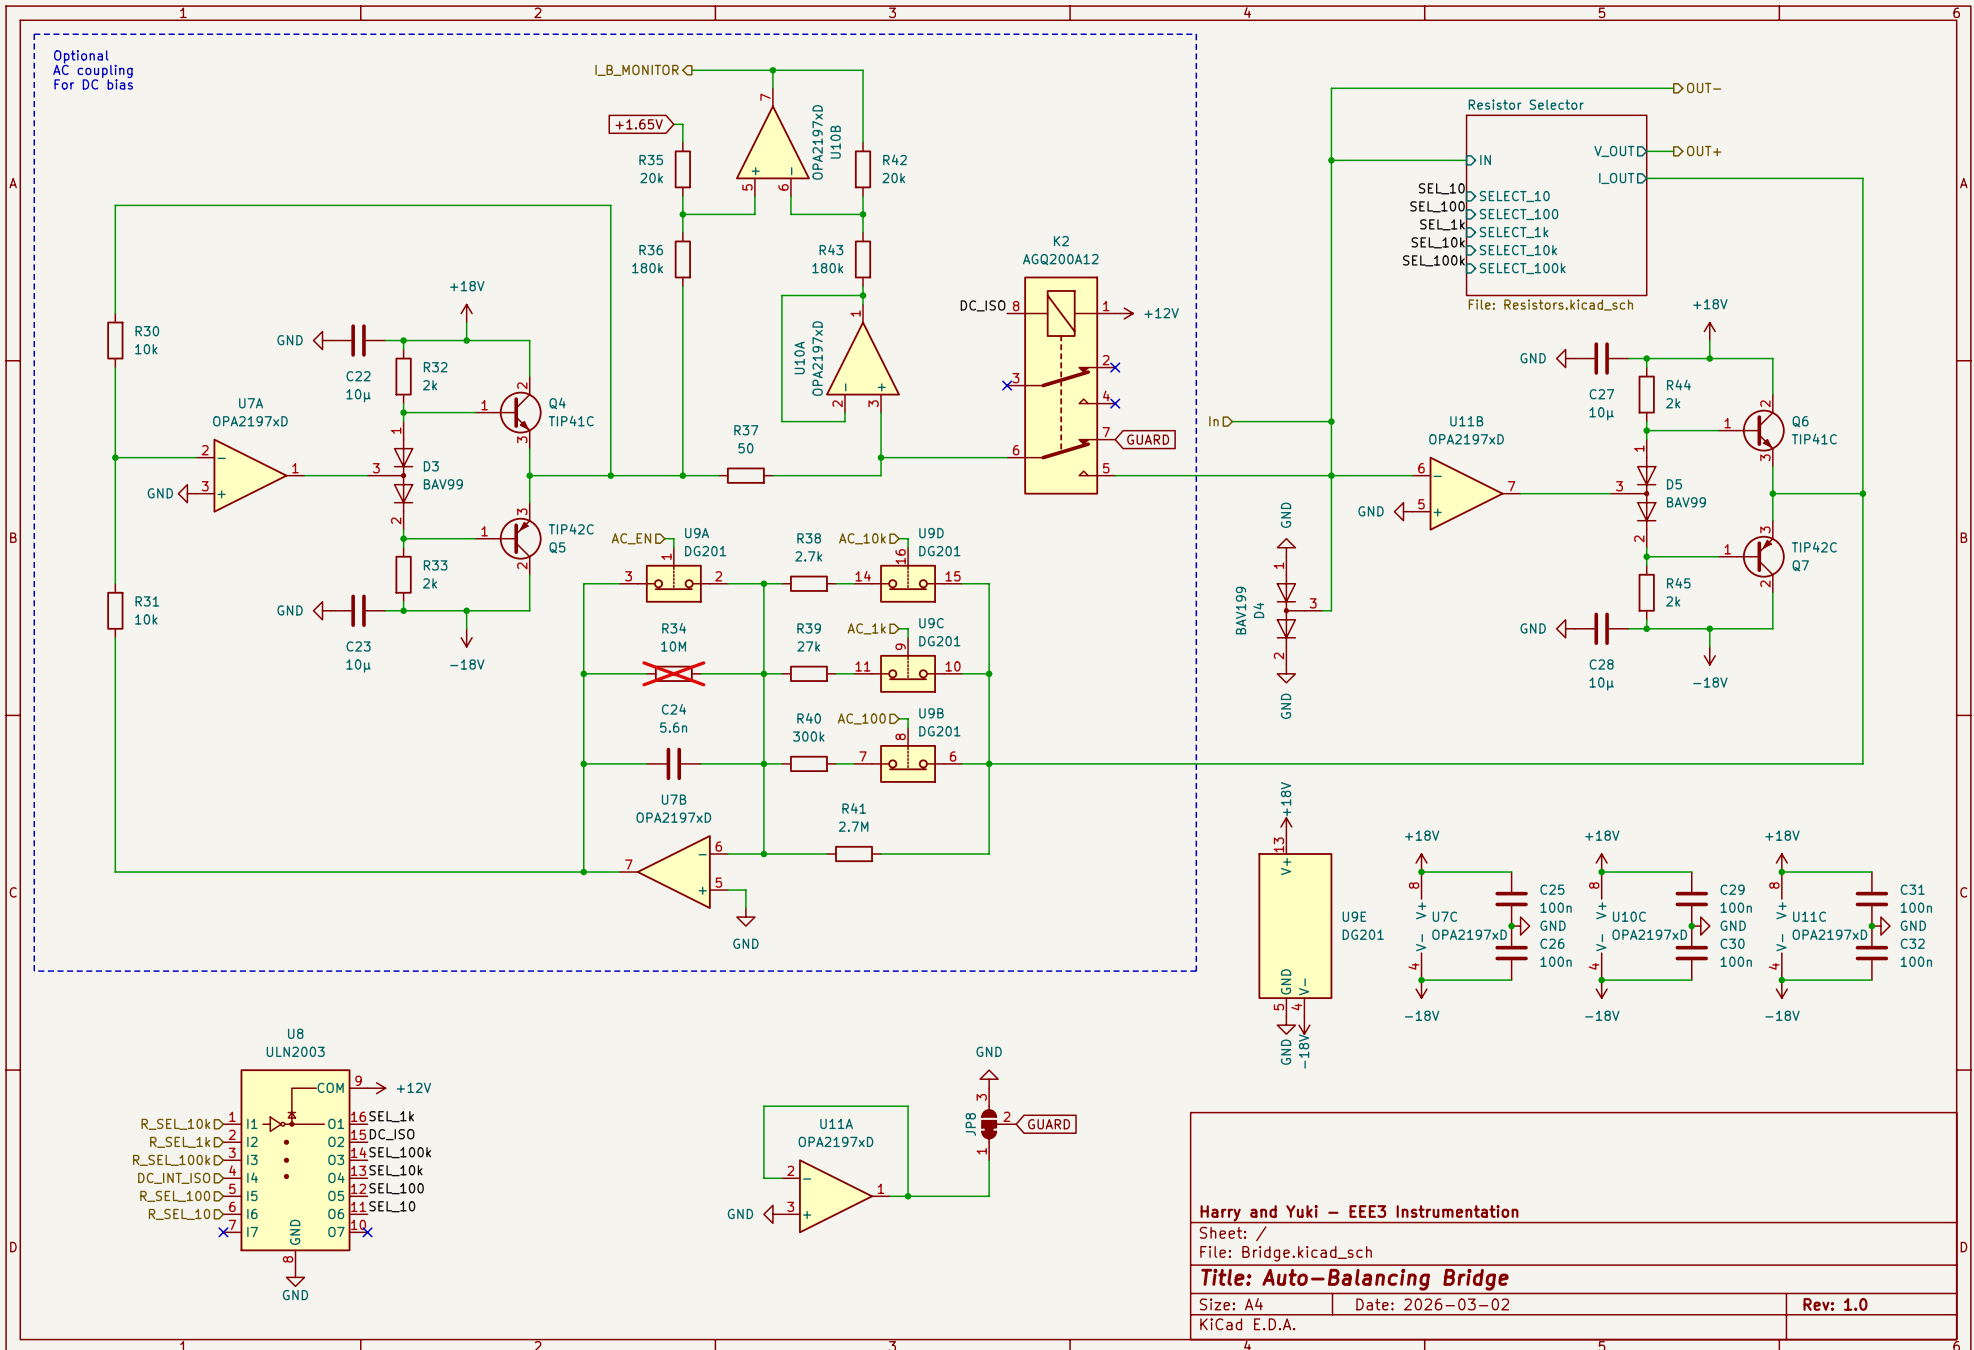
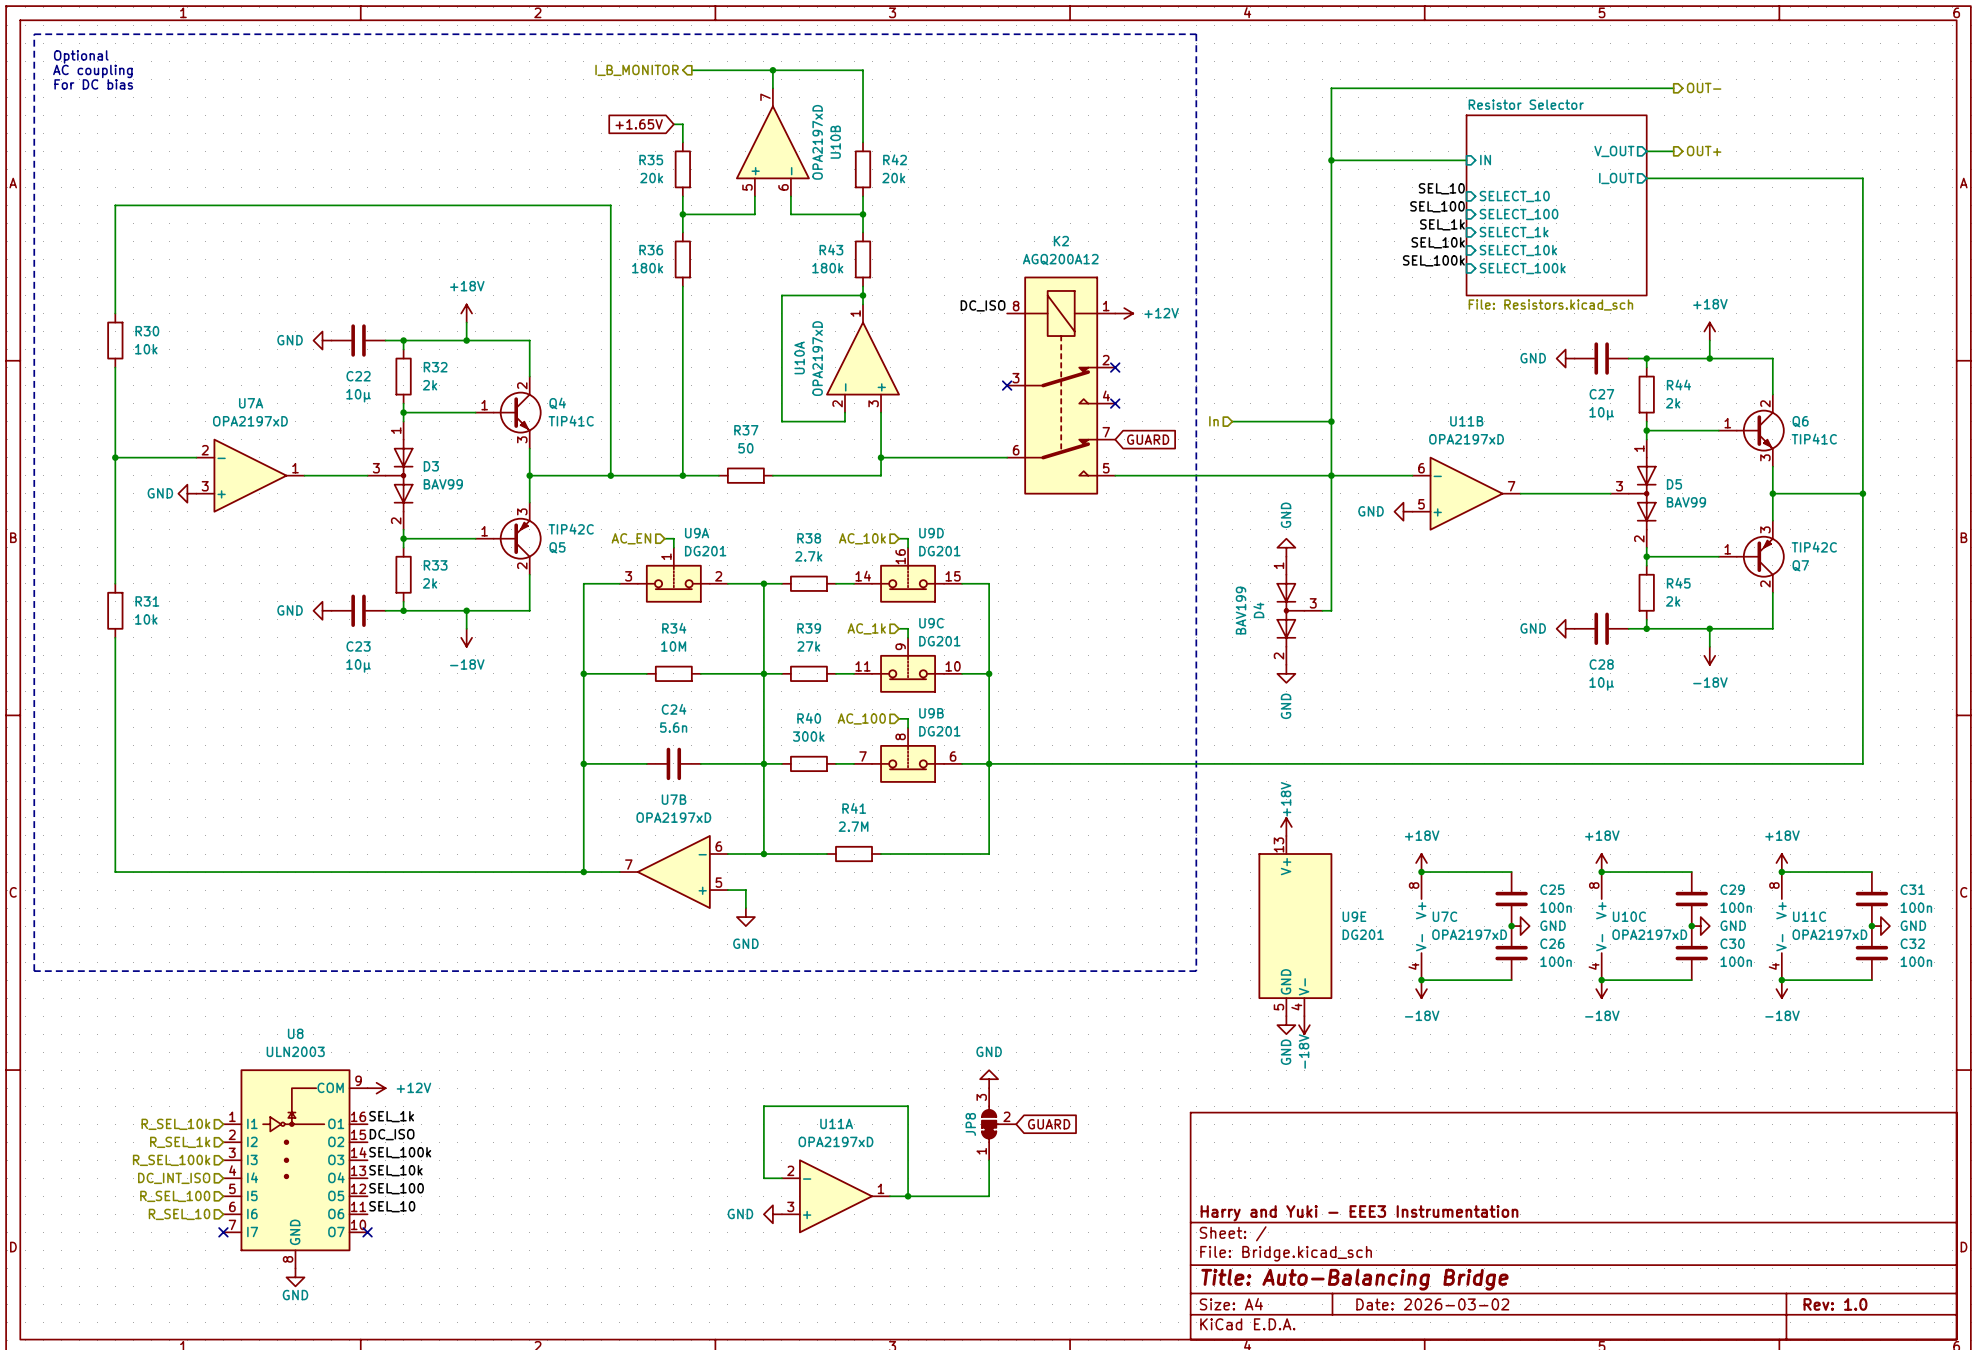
R34 do-not-place cross: (673, 673) -> none

